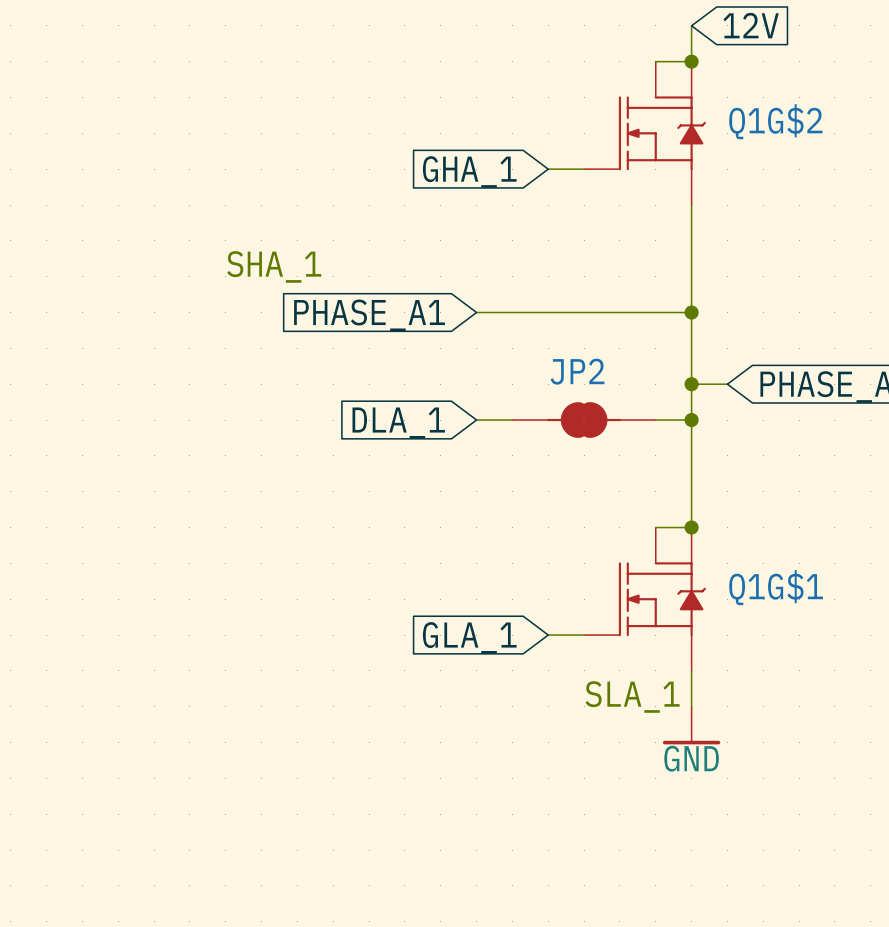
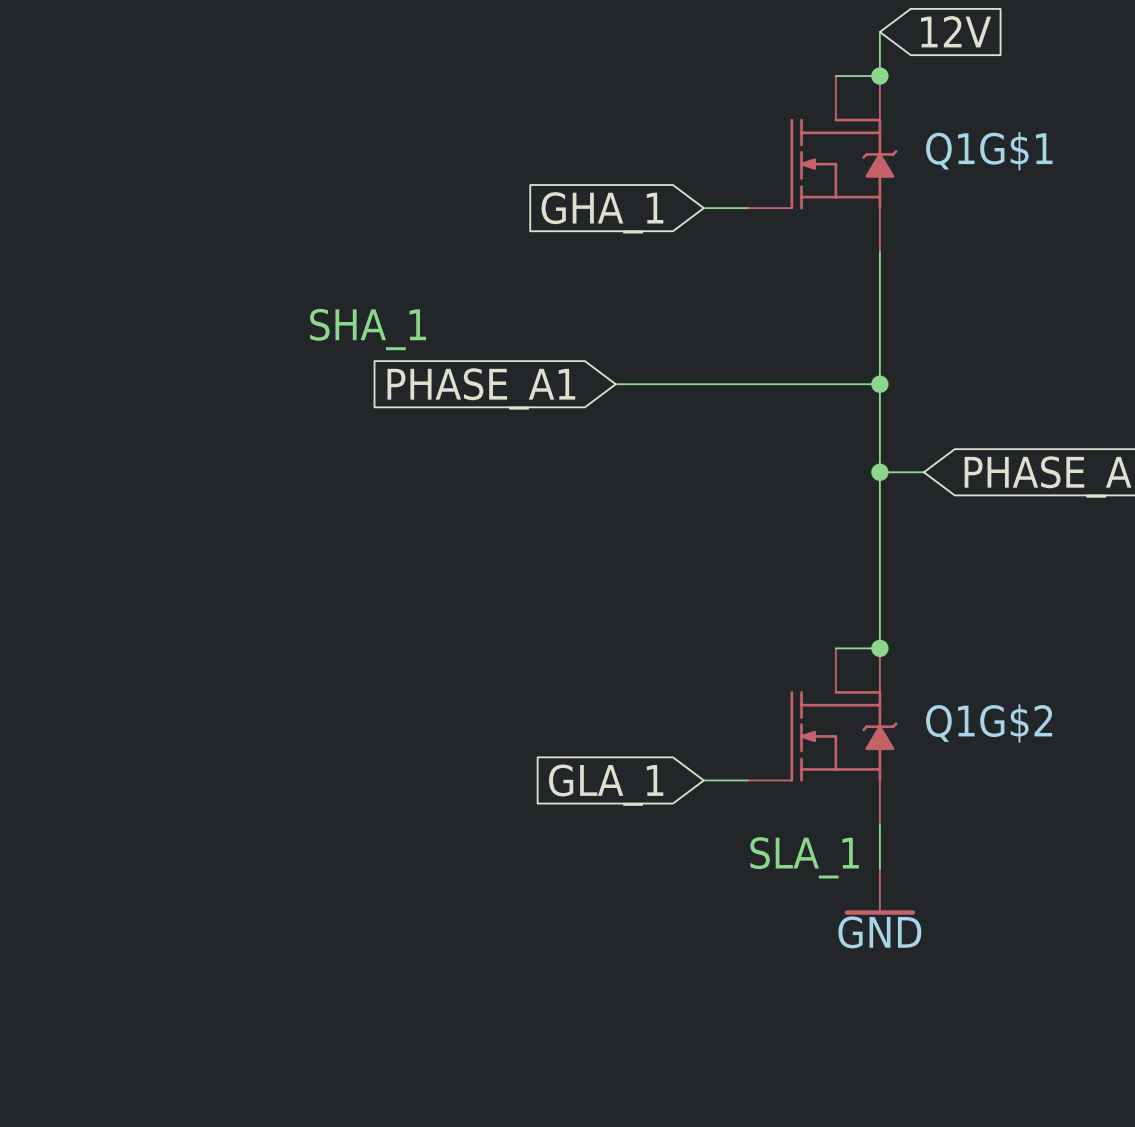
Q1G$2 name: Q1G$2 (775, 121) -> Q1G$1 (989, 151)
wire: (476, 420) (512, 420) -> none
JP2: (584, 420) -> none
wire: (655, 420) (691, 420) -> none
junction: (691, 420) -> none
global label: DLA_1 (398, 423) -> none
Q1G$1 name: Q1G$1 (776, 587) -> Q1G$2 (989, 723)

